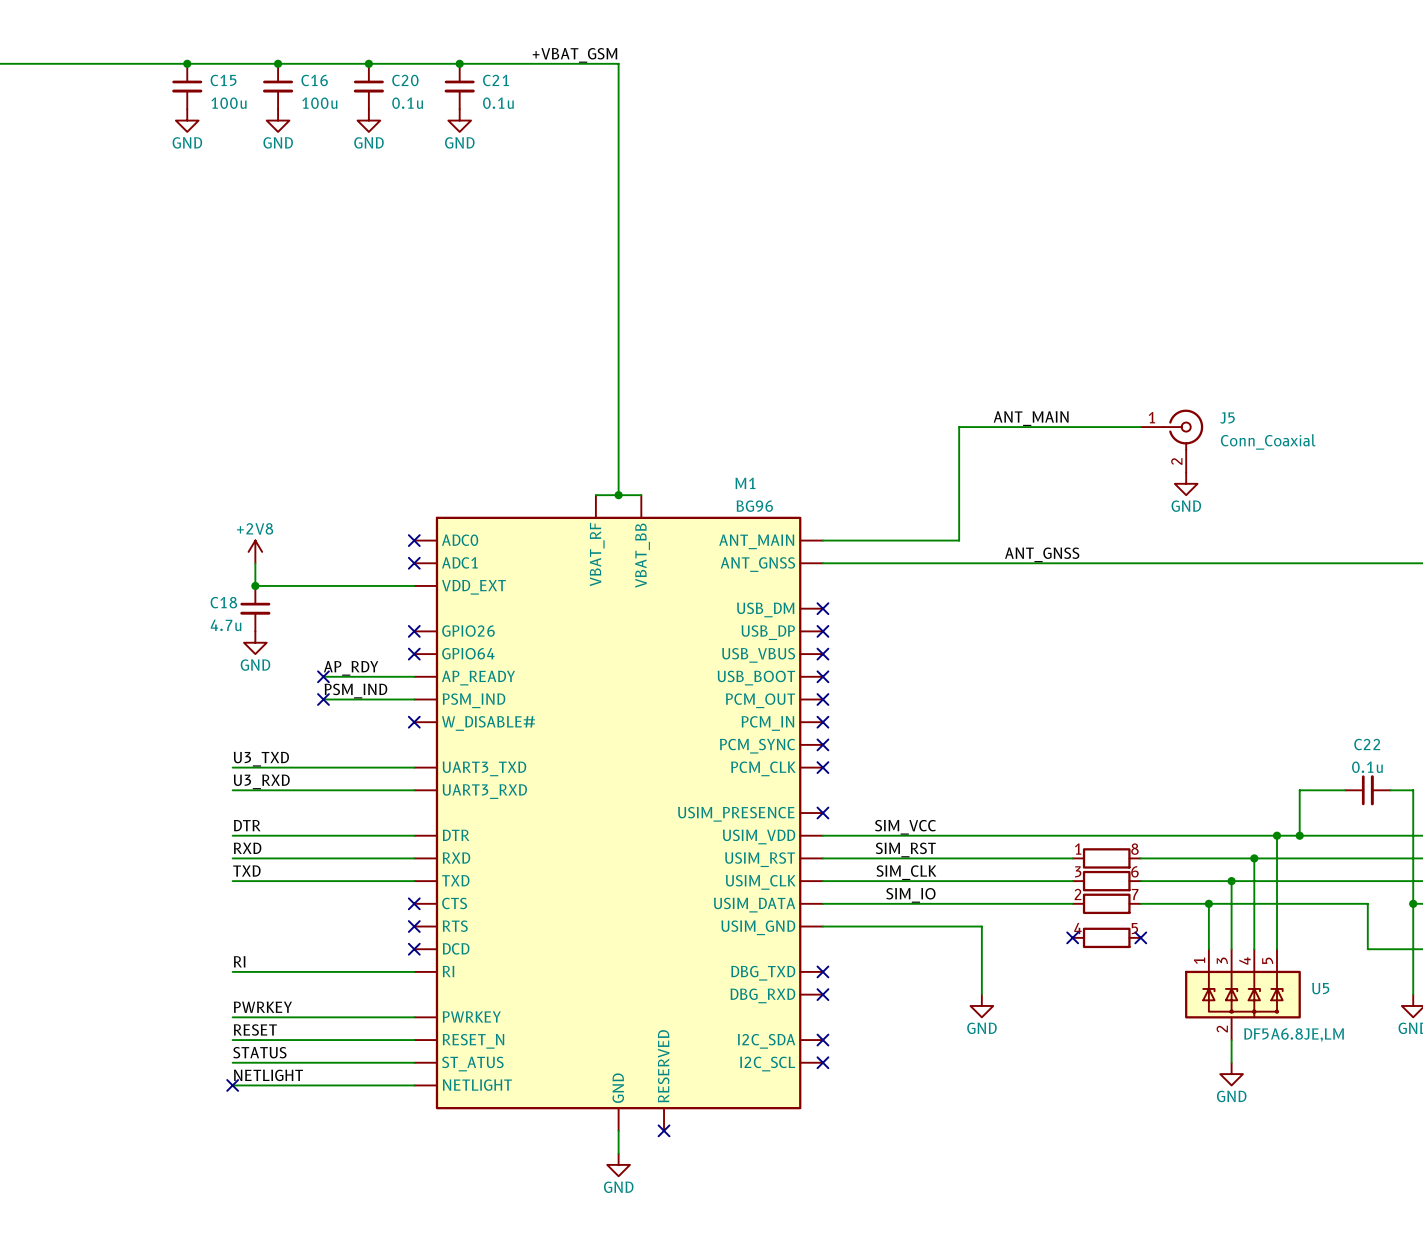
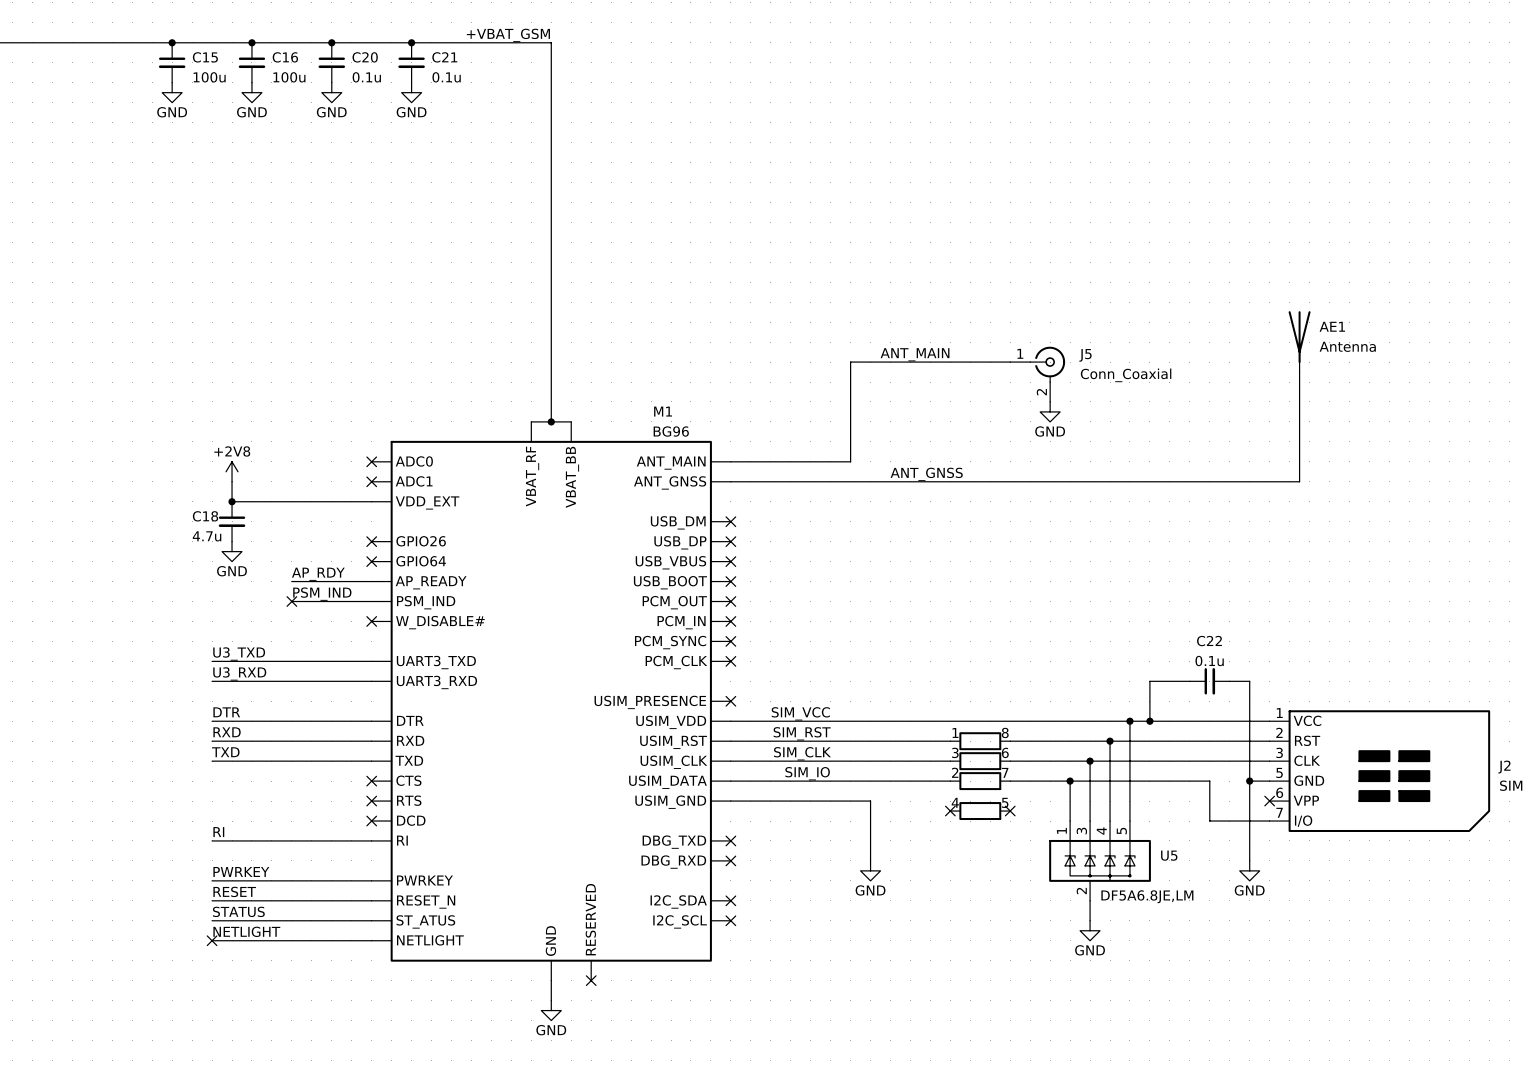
no-connect mark: (323, 676) -> none

